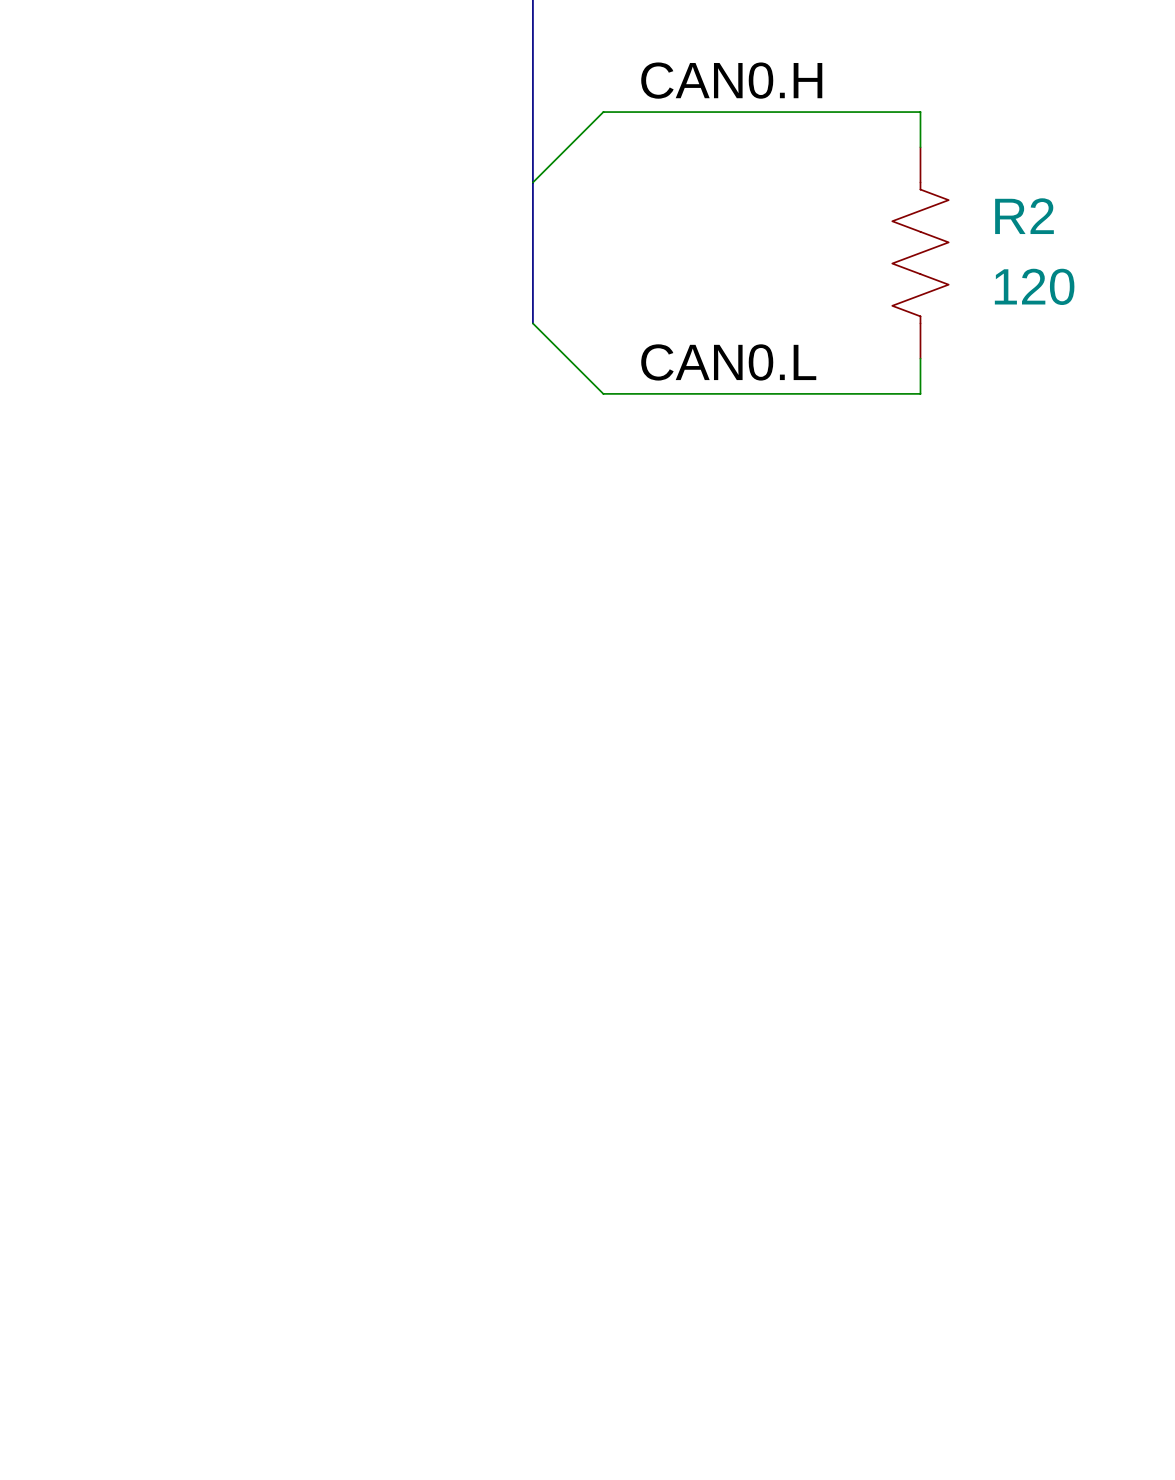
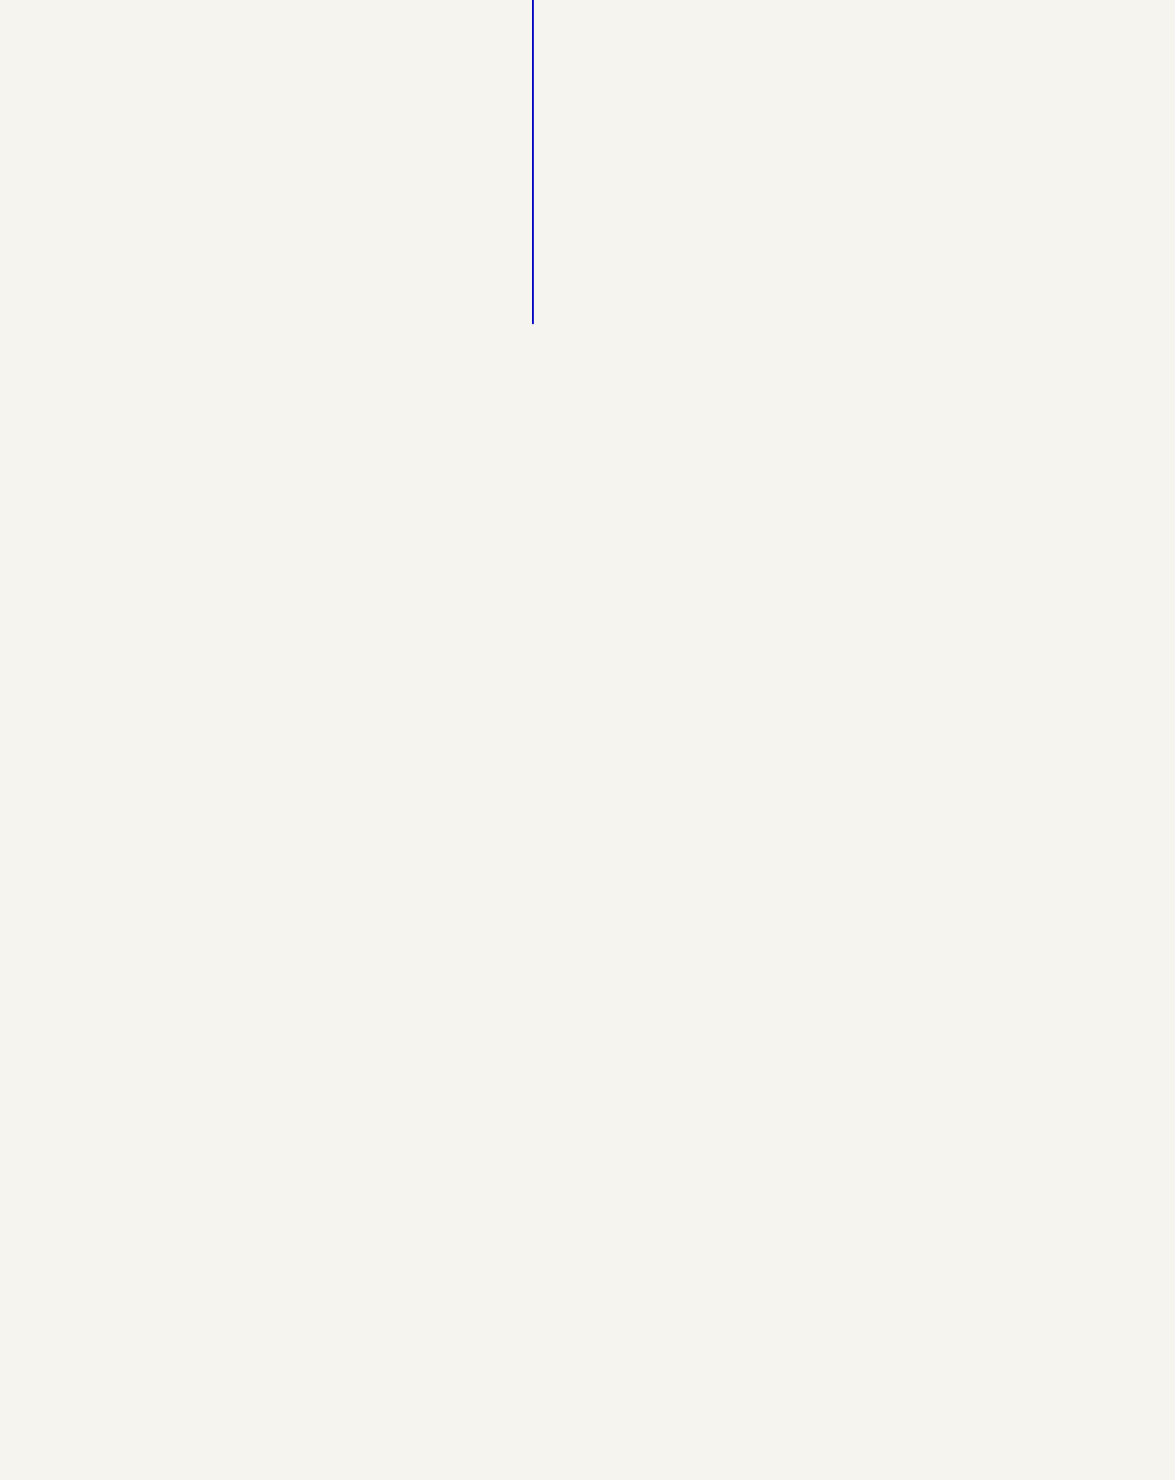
label: CAN0.H (731, 80) -> none
wire: (920, 147) (920, 112) (603, 112) (532, 182) -> none
R2: 120 (920, 252) -> none
wire: (532, 323) (603, 393) (920, 393) (920, 358) -> none
label: CAN0.L (728, 362) -> none

